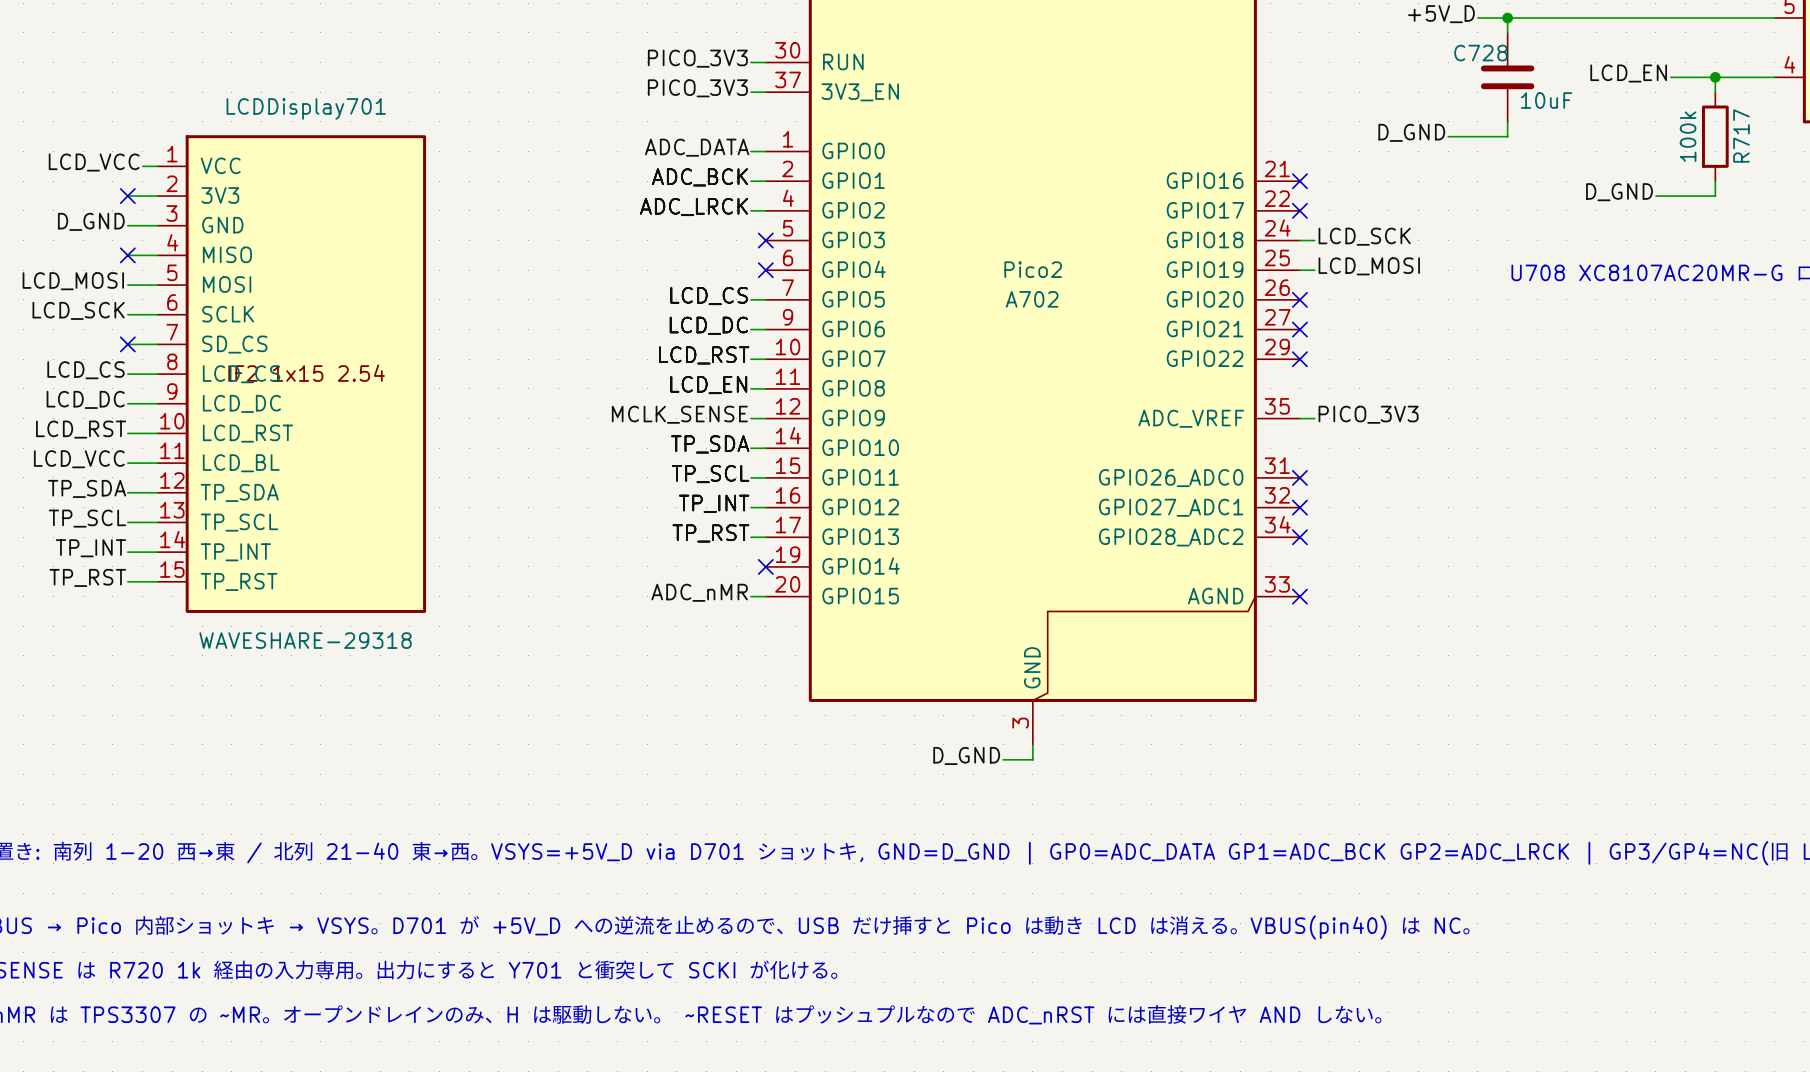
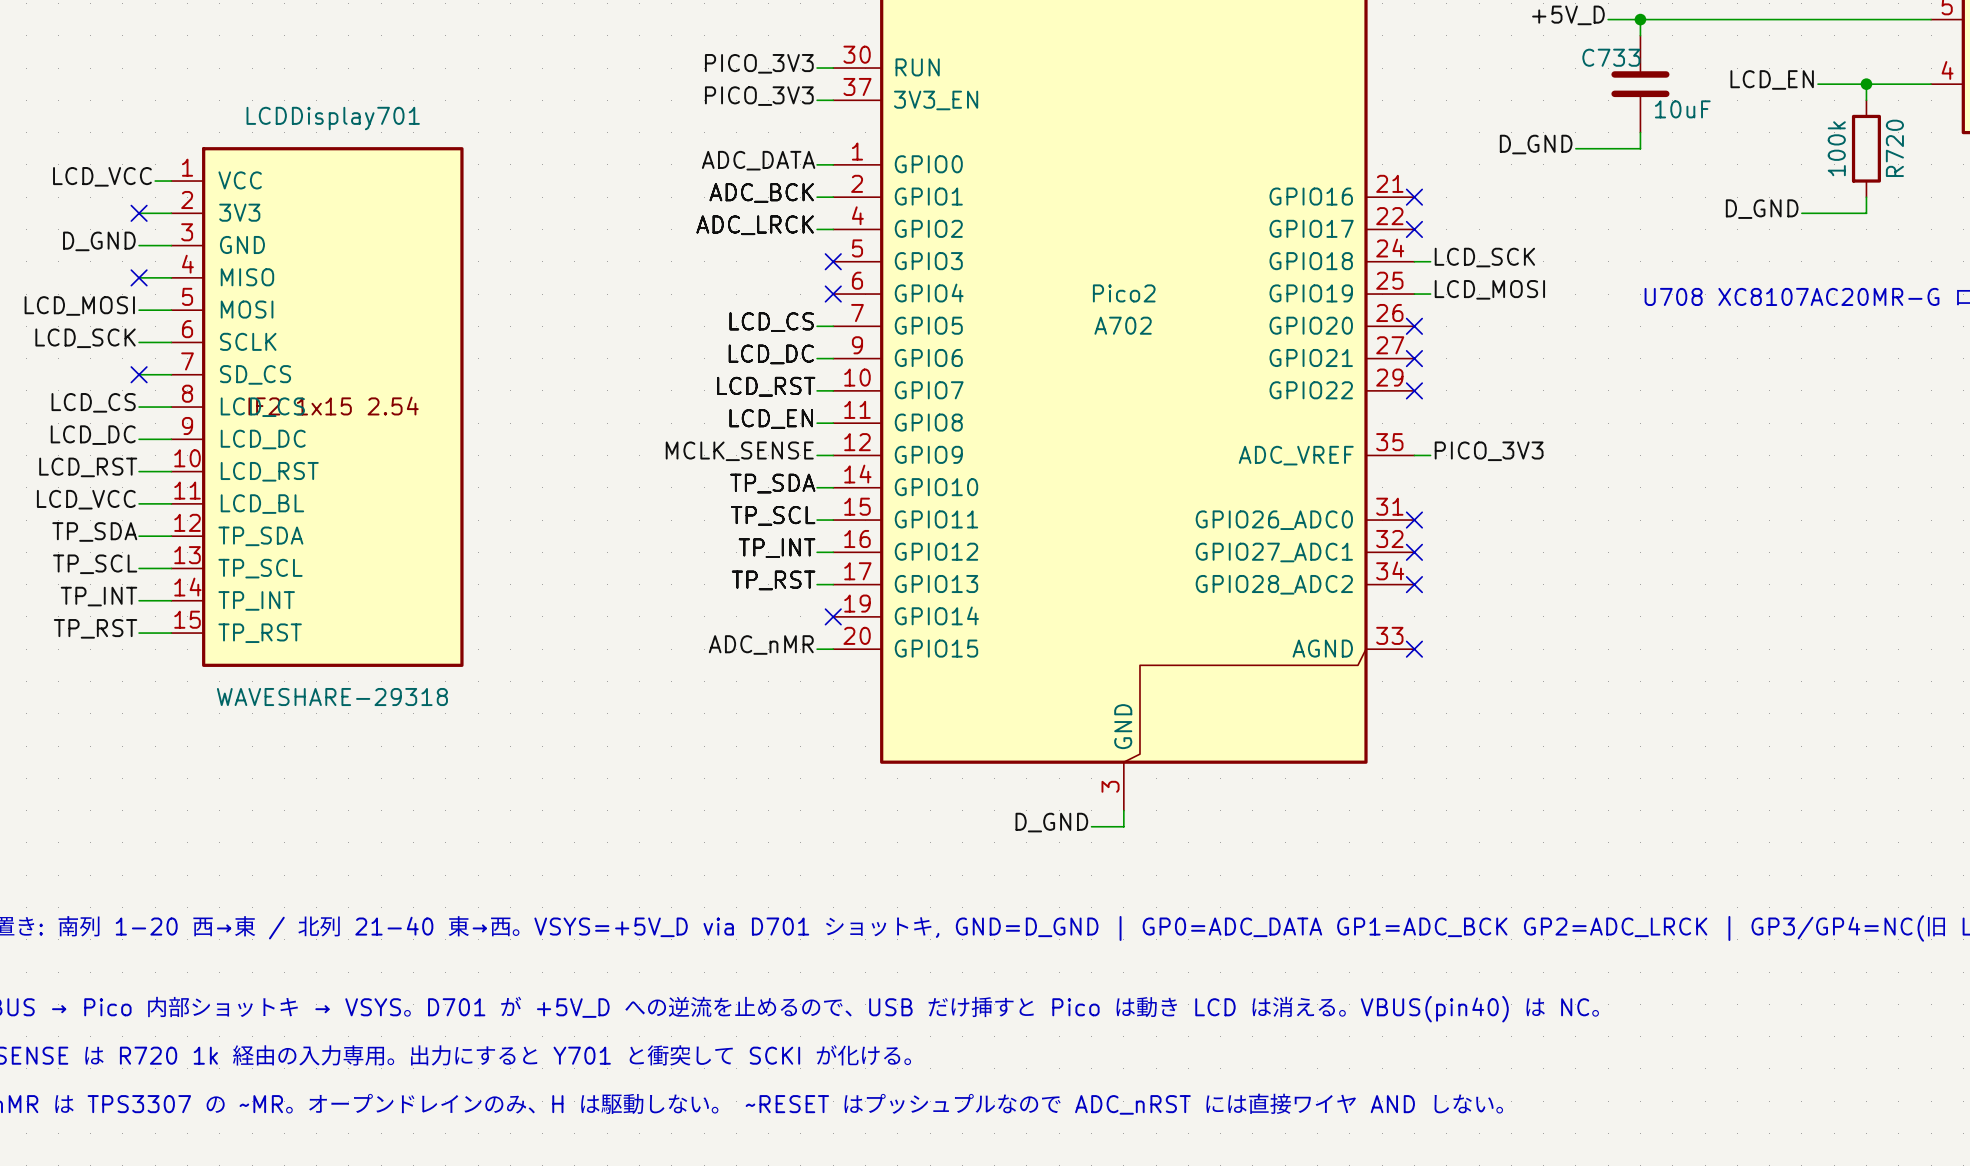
C728 name: C728 (1480, 53) -> C733 (1611, 57)
R717 name: R717 (1741, 135) -> R720 (1894, 148)

